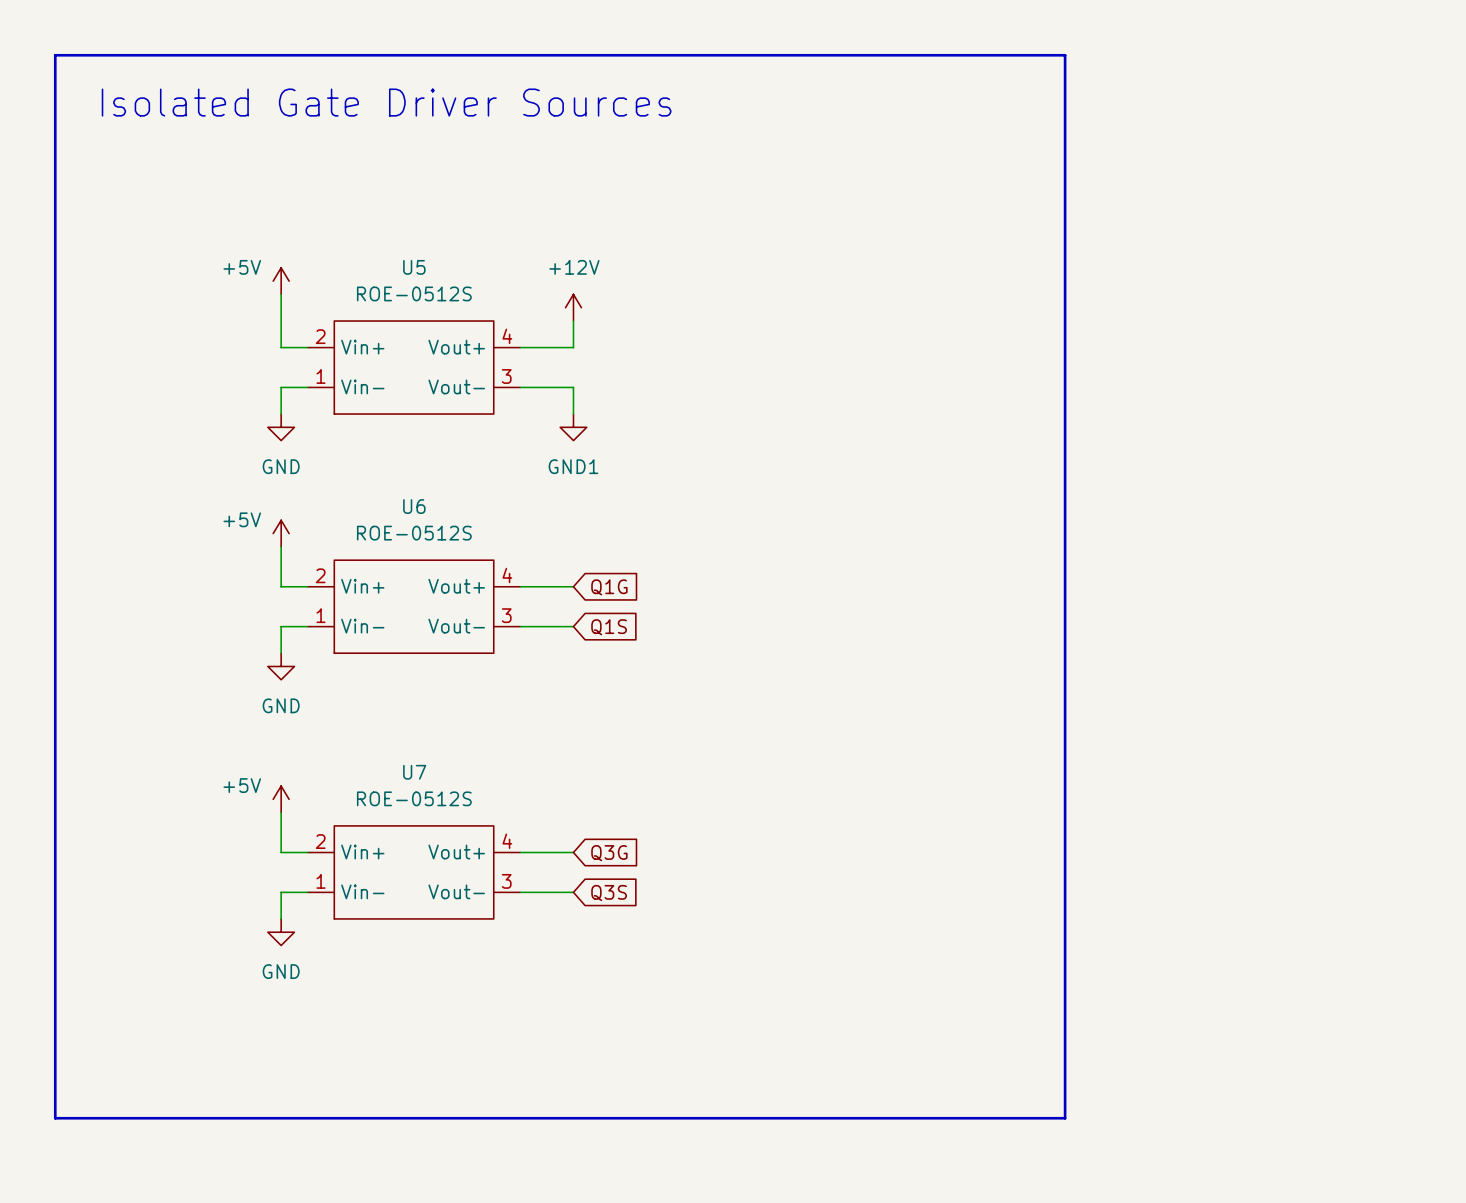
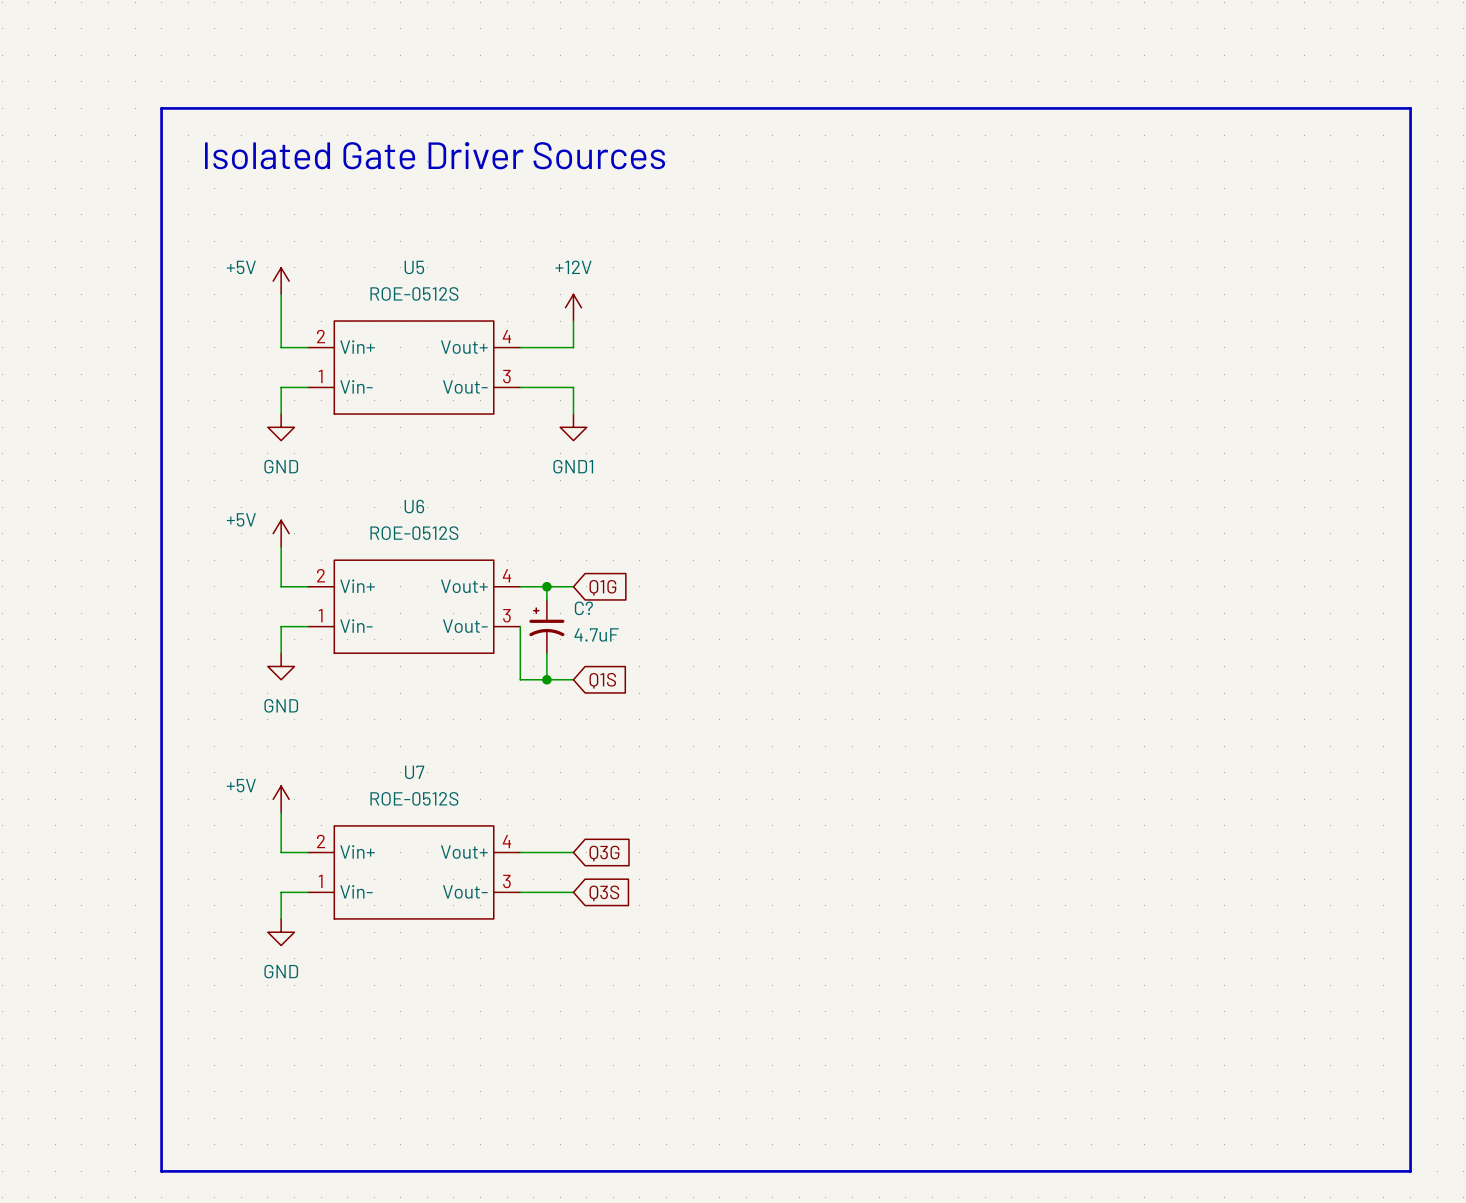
line: (55, 55) (1065, 55) (1065, 1118) (55, 1118) (55, 55) -> (161, 108) (161, 1171) (1410, 1171) (1410, 108) (161, 108)
text position: Isolated Gate Driver Sources (386, 102) -> Isolated Gate Driver Sources (435, 155)
wire: none -> (546, 586) (546, 600)
junction: none -> (546, 586)
wire: (520, 626) (573, 626) -> (520, 626) (520, 679) (573, 679)
C?: none -> 4.7uF (546, 626)
global label position: Q1S (609, 627) -> Q1S (602, 680)
wire: none -> (546, 653) (546, 679)
junction: none -> (546, 679)

